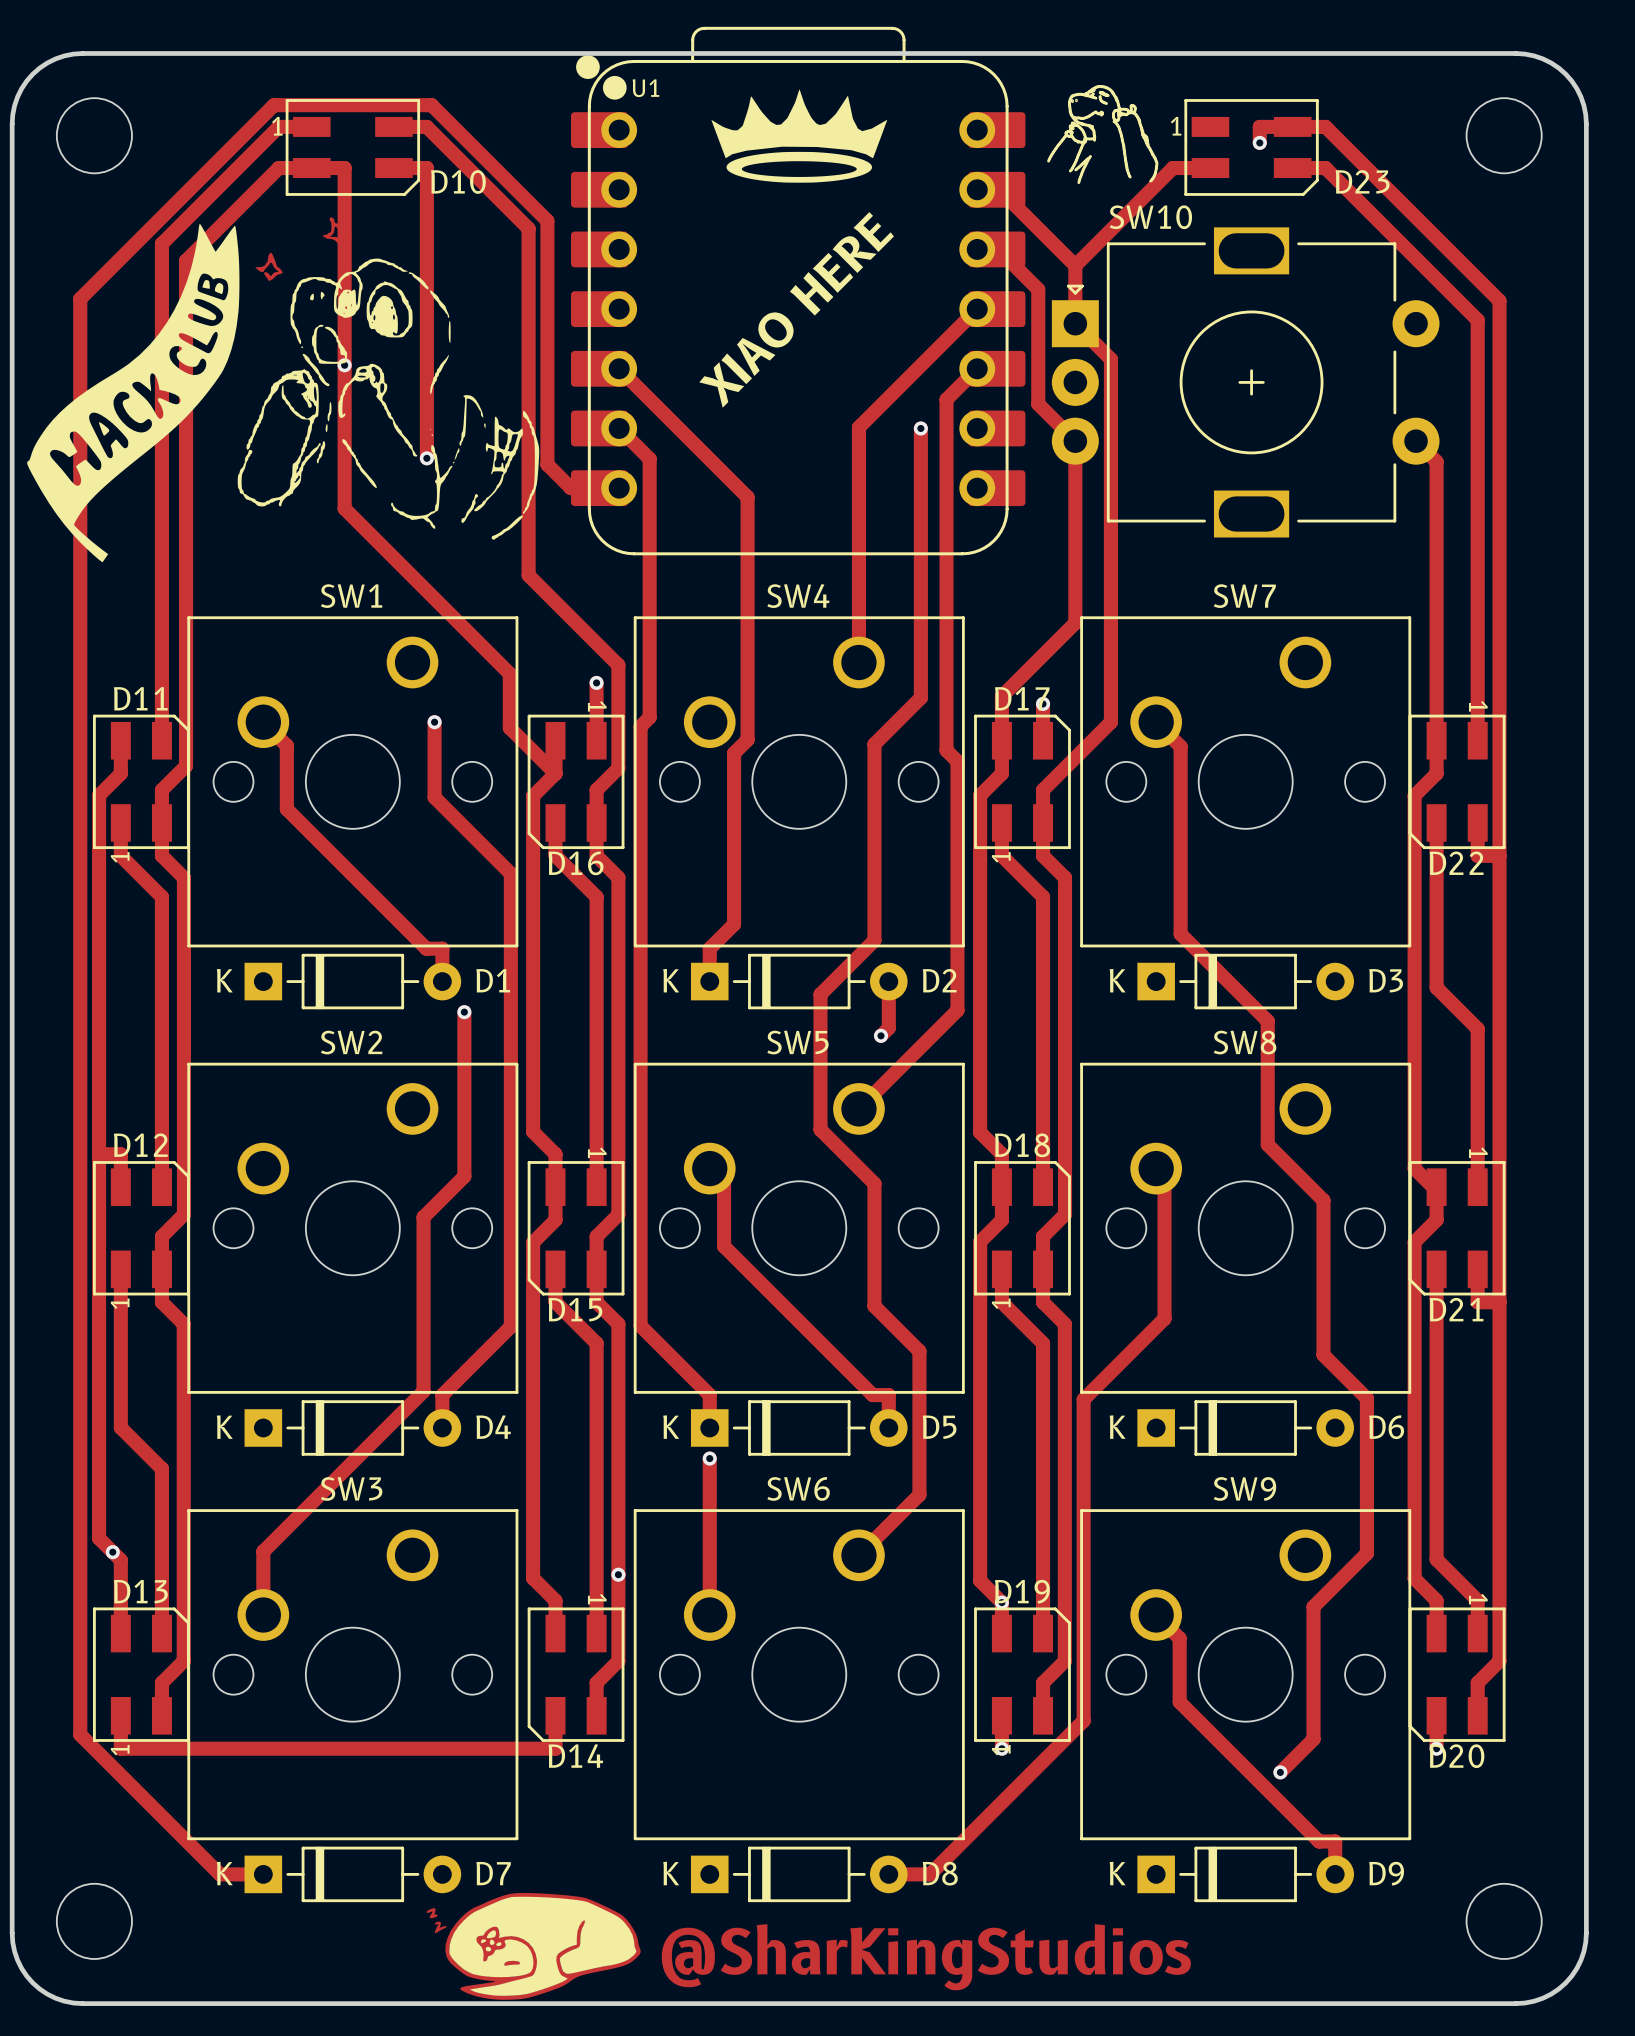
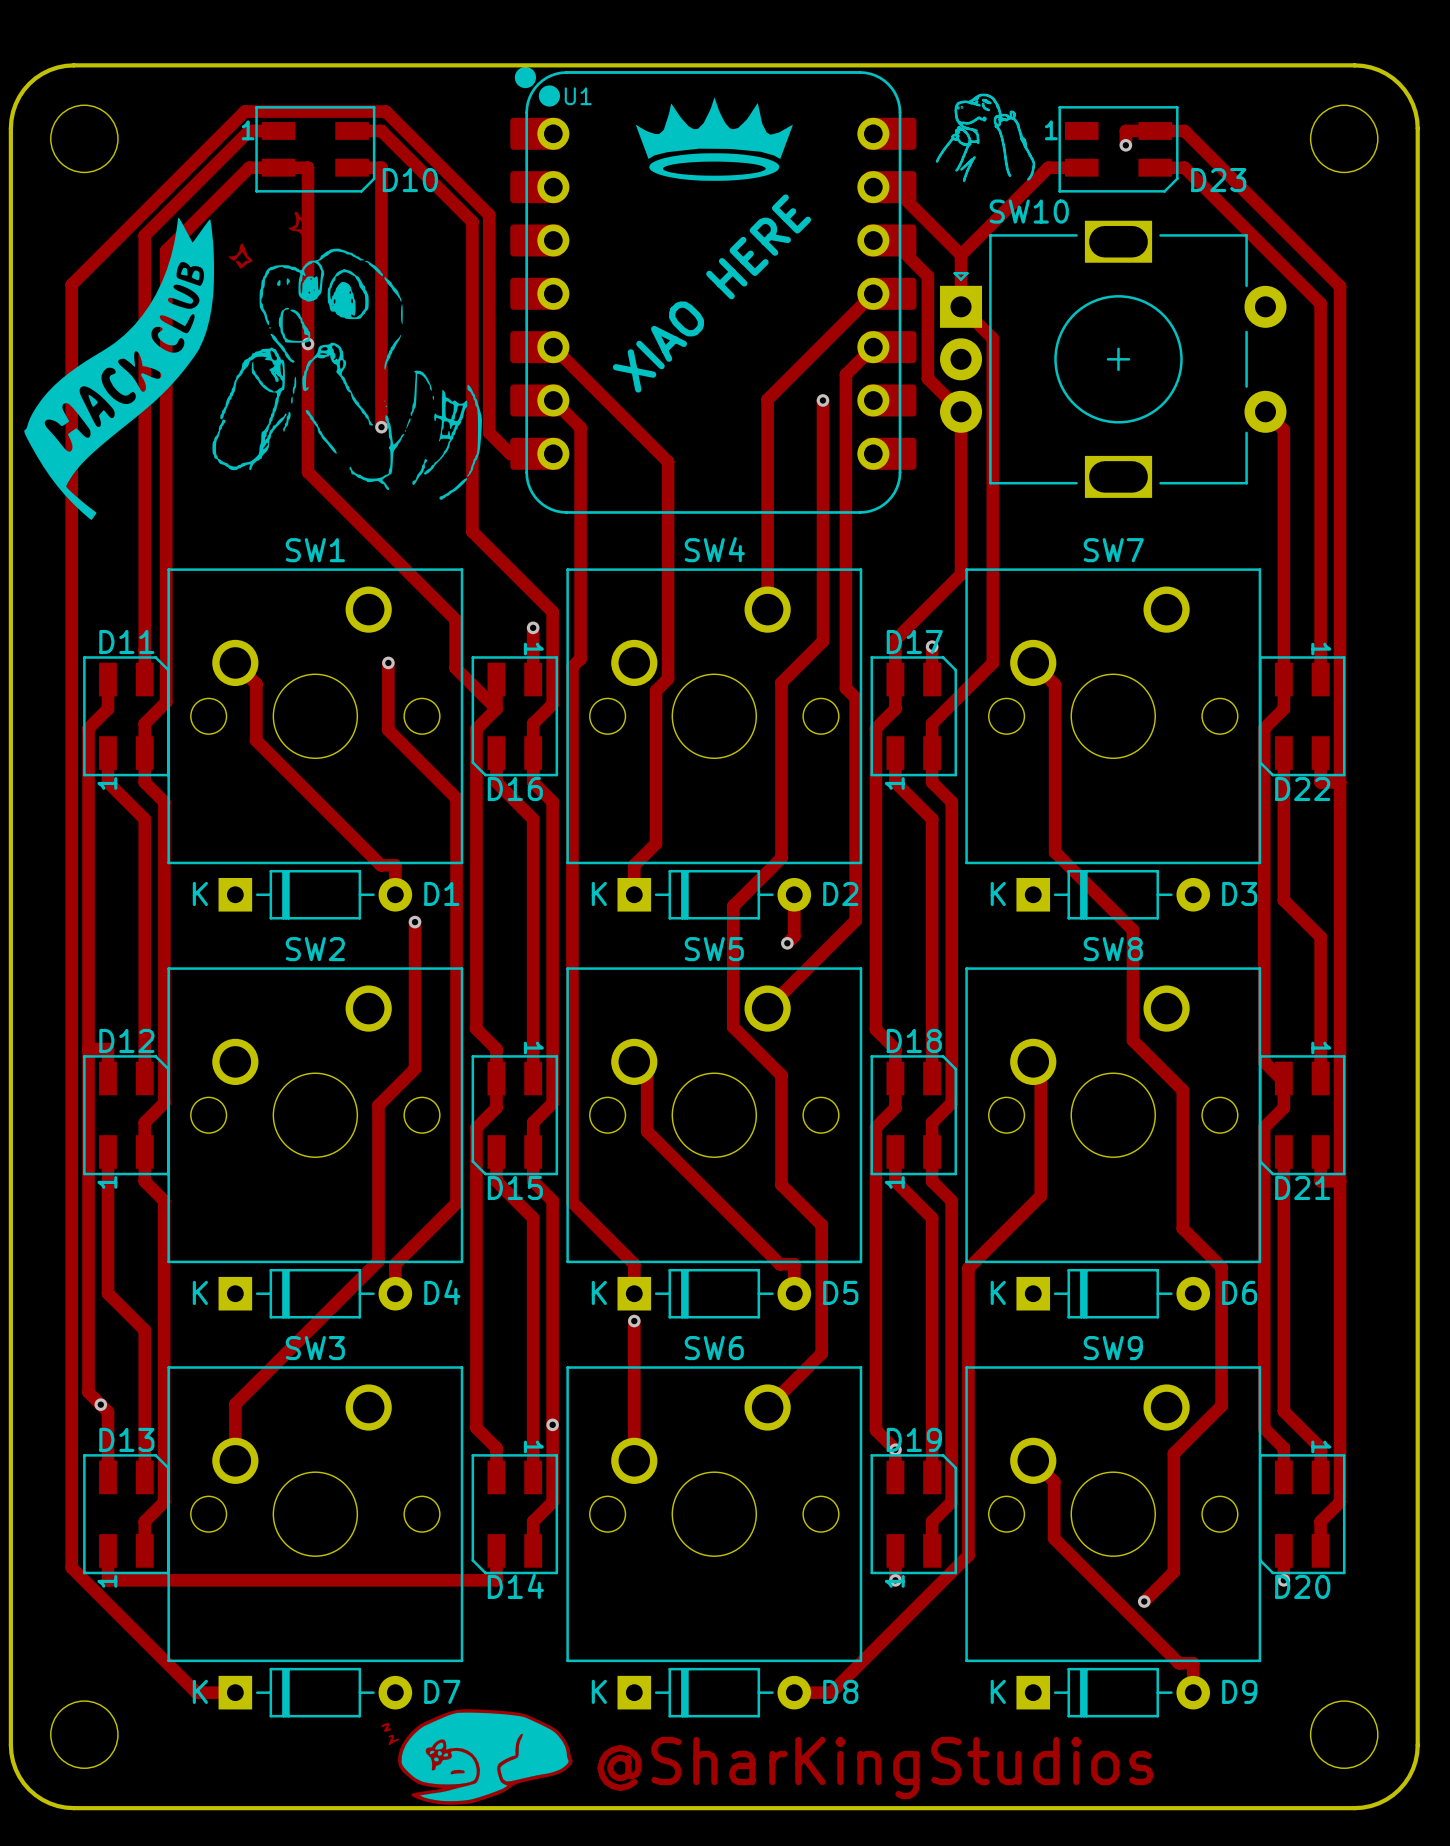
U1 footprint: [570, 26, 1026, 556] -> [510, 66, 917, 514]

